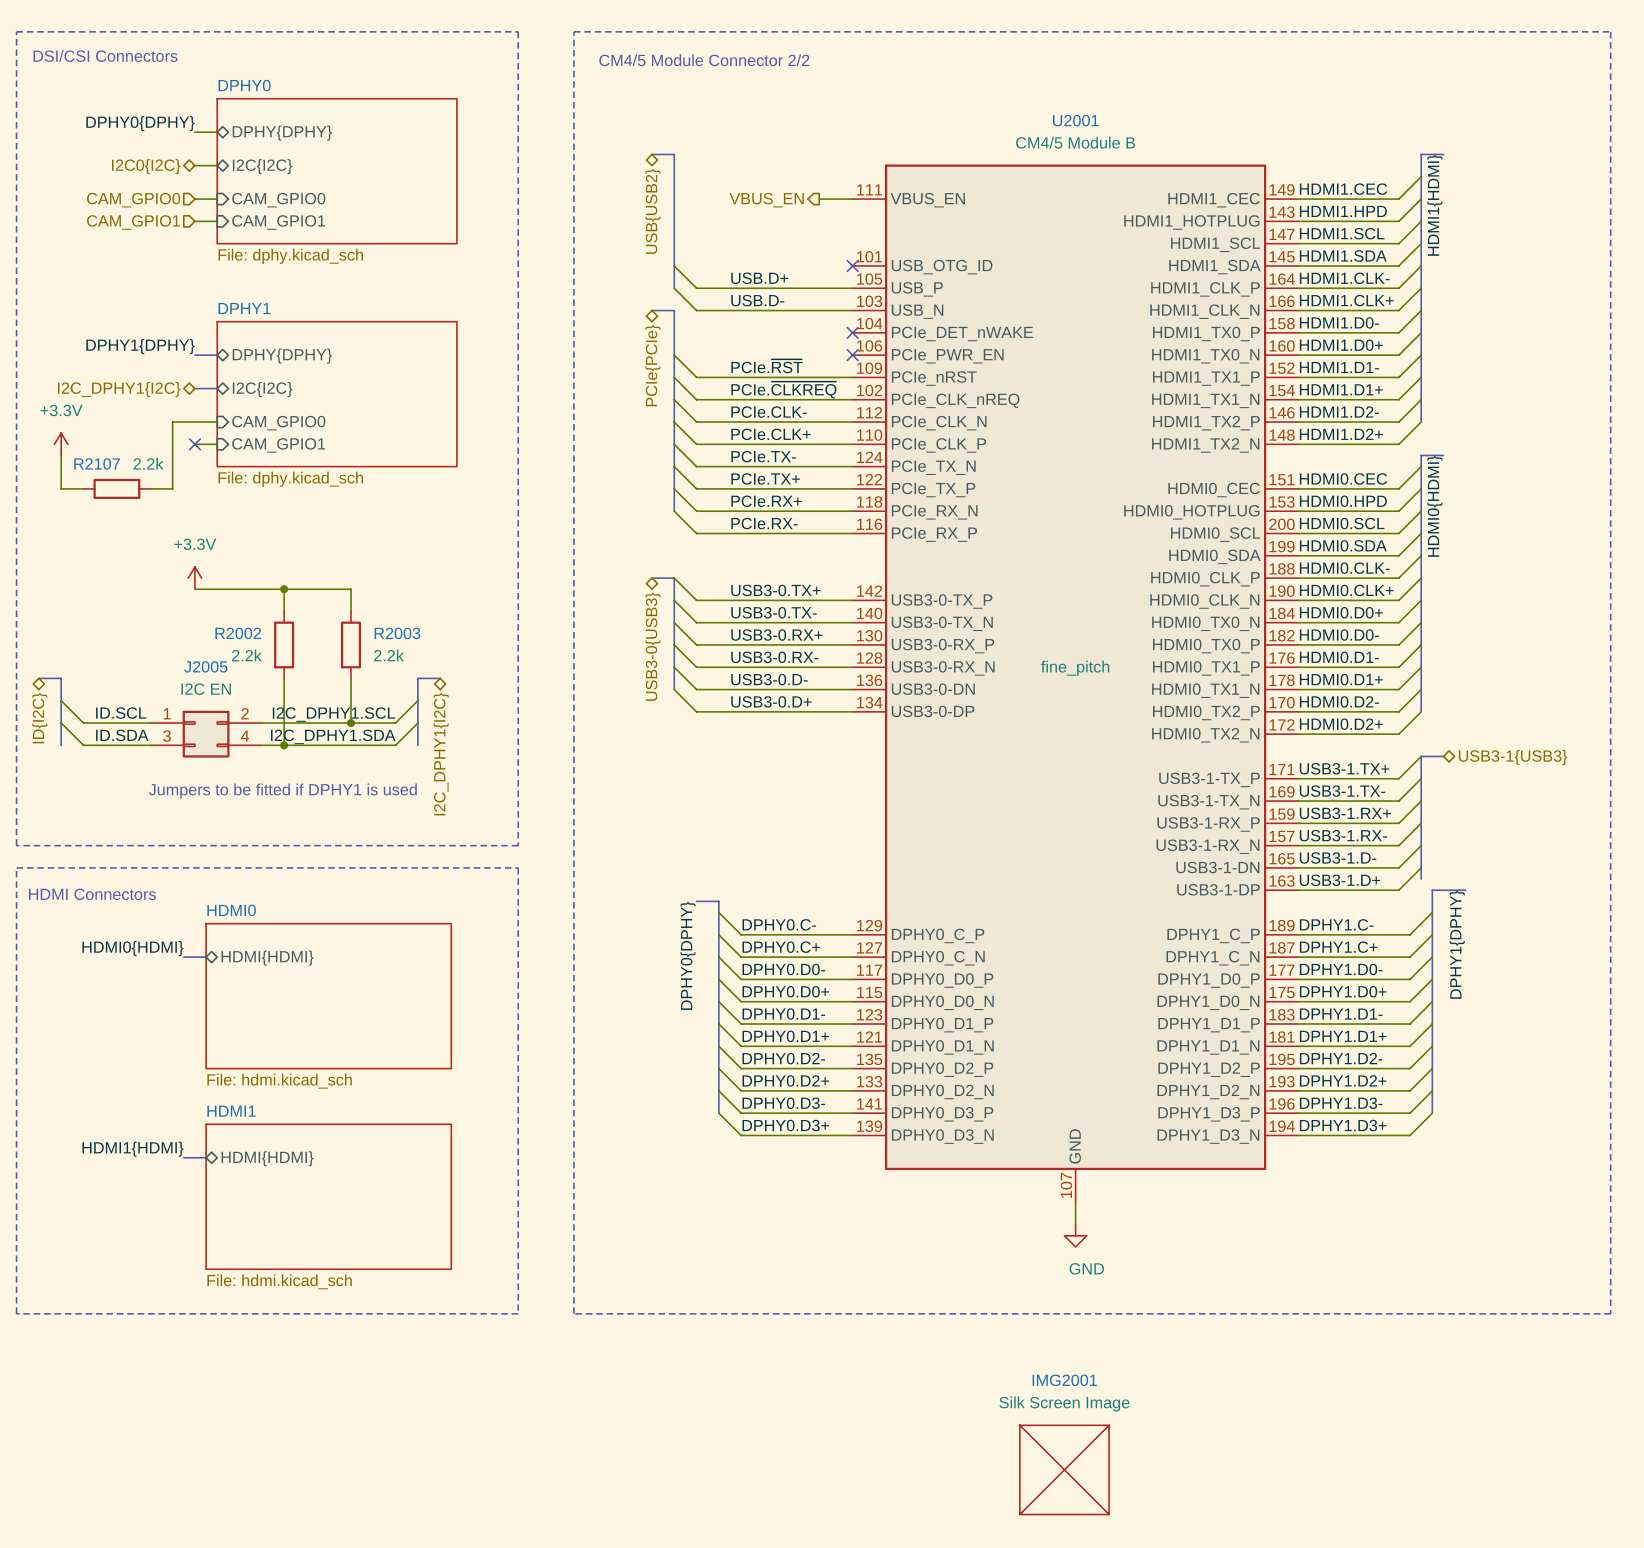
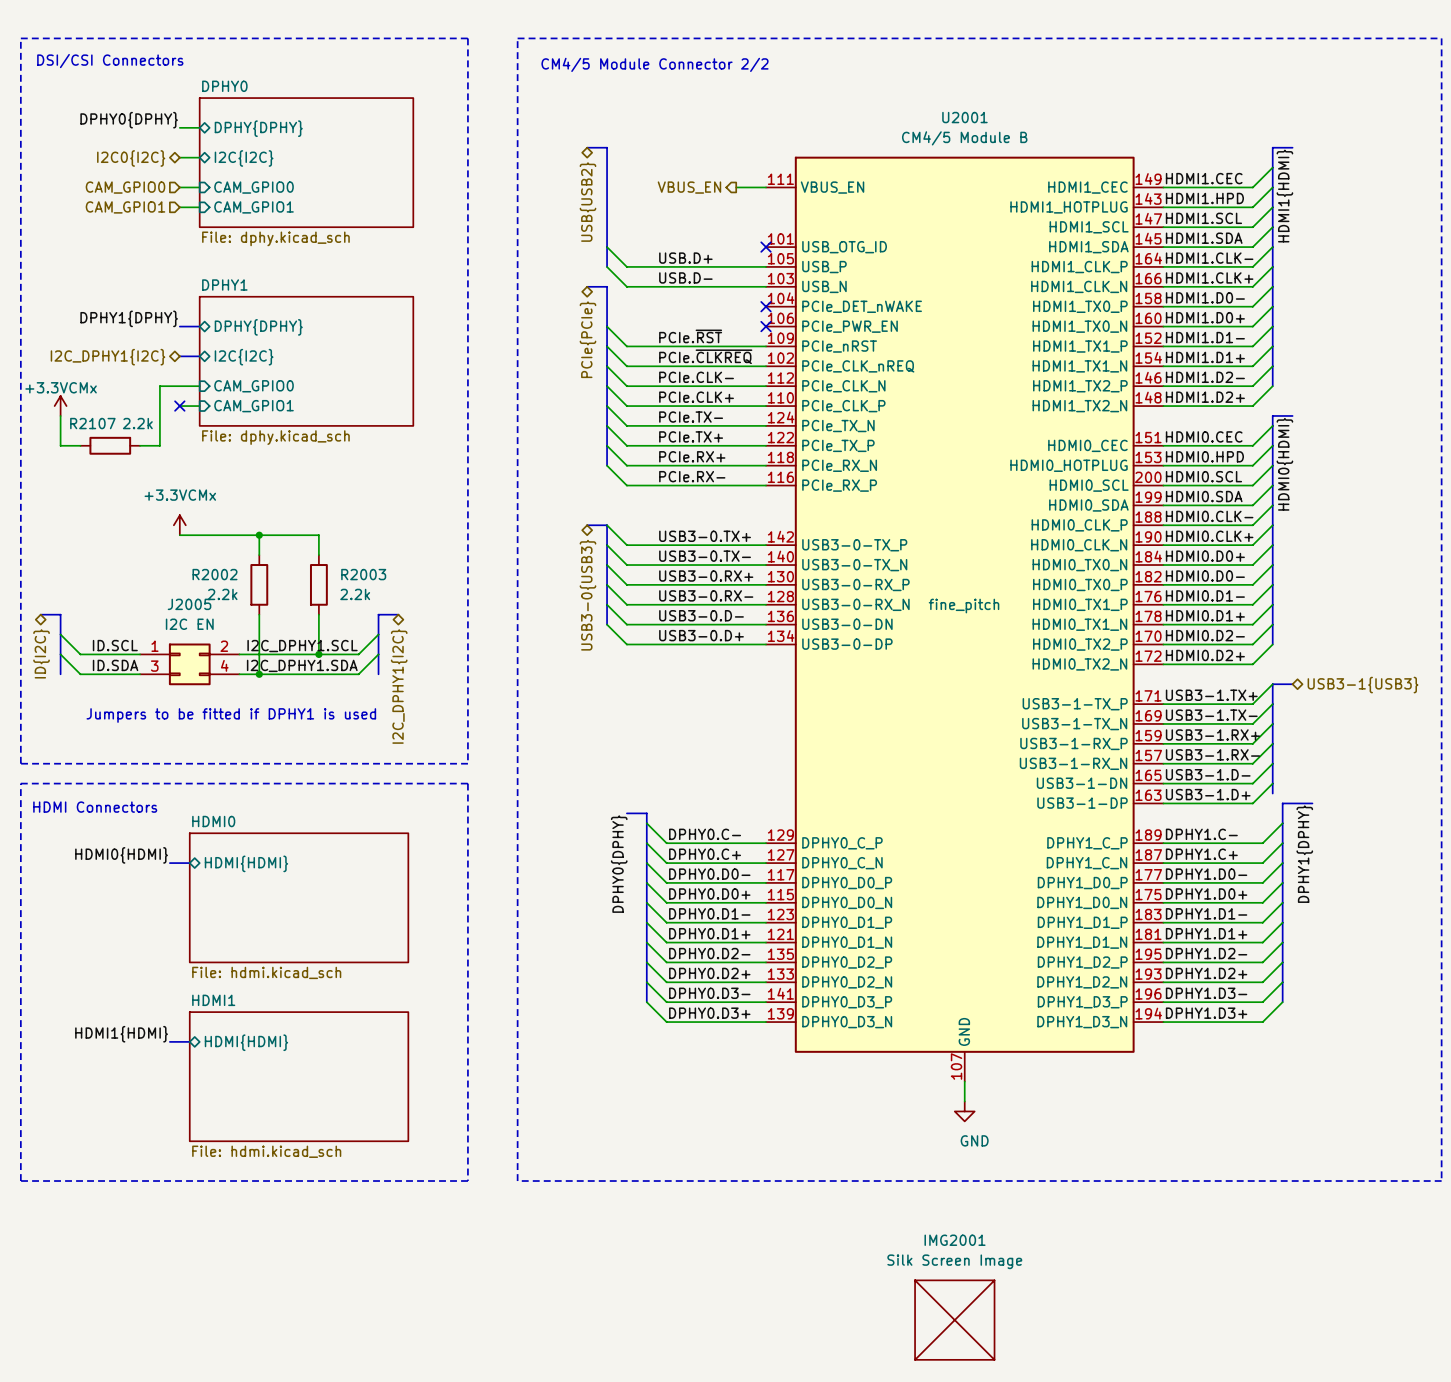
power symbol: +3.3V (61, 444) -> +3.3VCMx (60, 406)
power symbol: +3.3V (194, 578) -> +3.3VCMx (179, 525)

